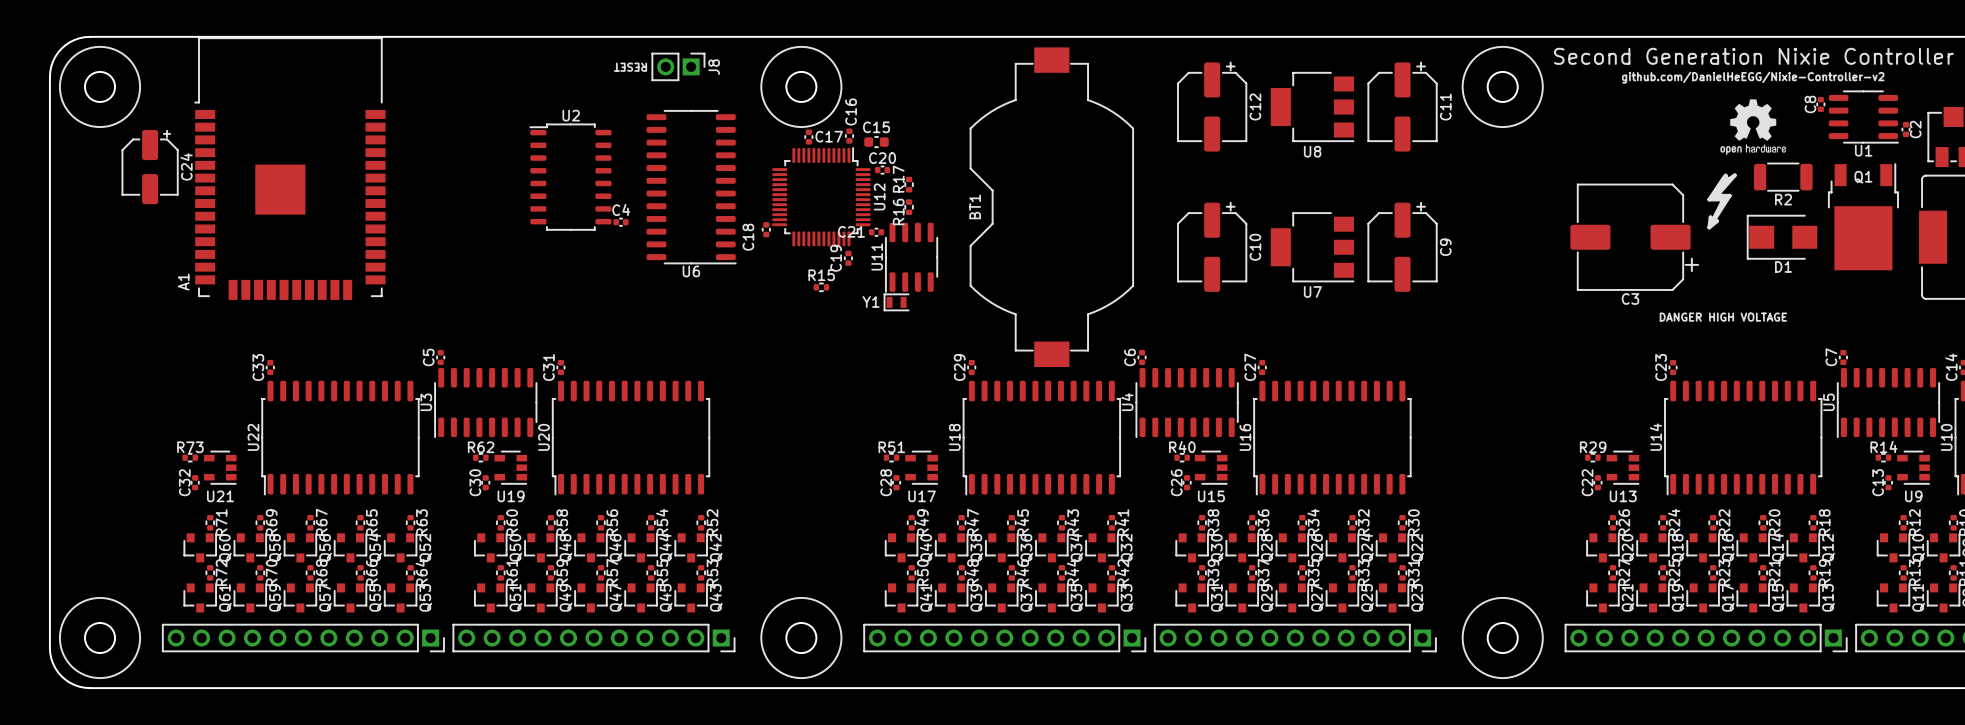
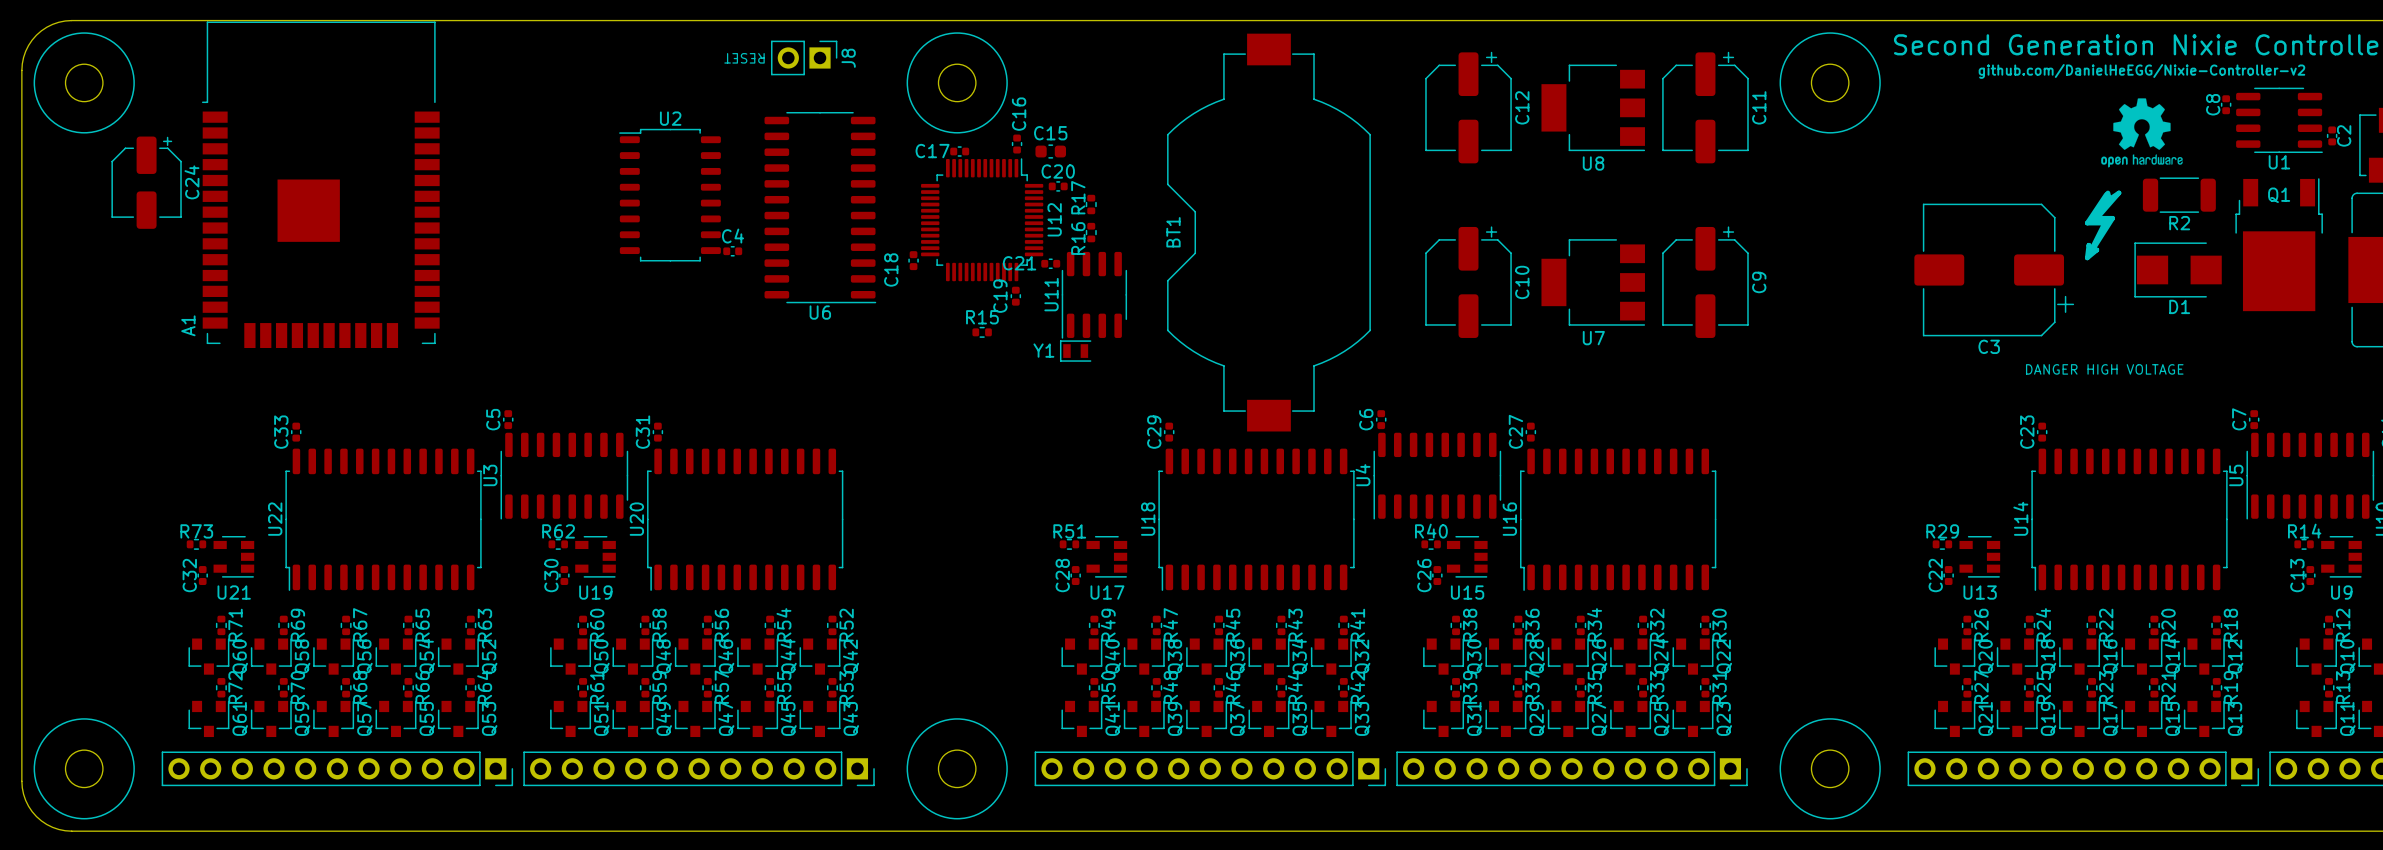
C17 name position: C17 (829, 136) -> C17 (932, 151)
C17 rotation: 0° (808, 137) -> 90° clockwise (959, 151)

